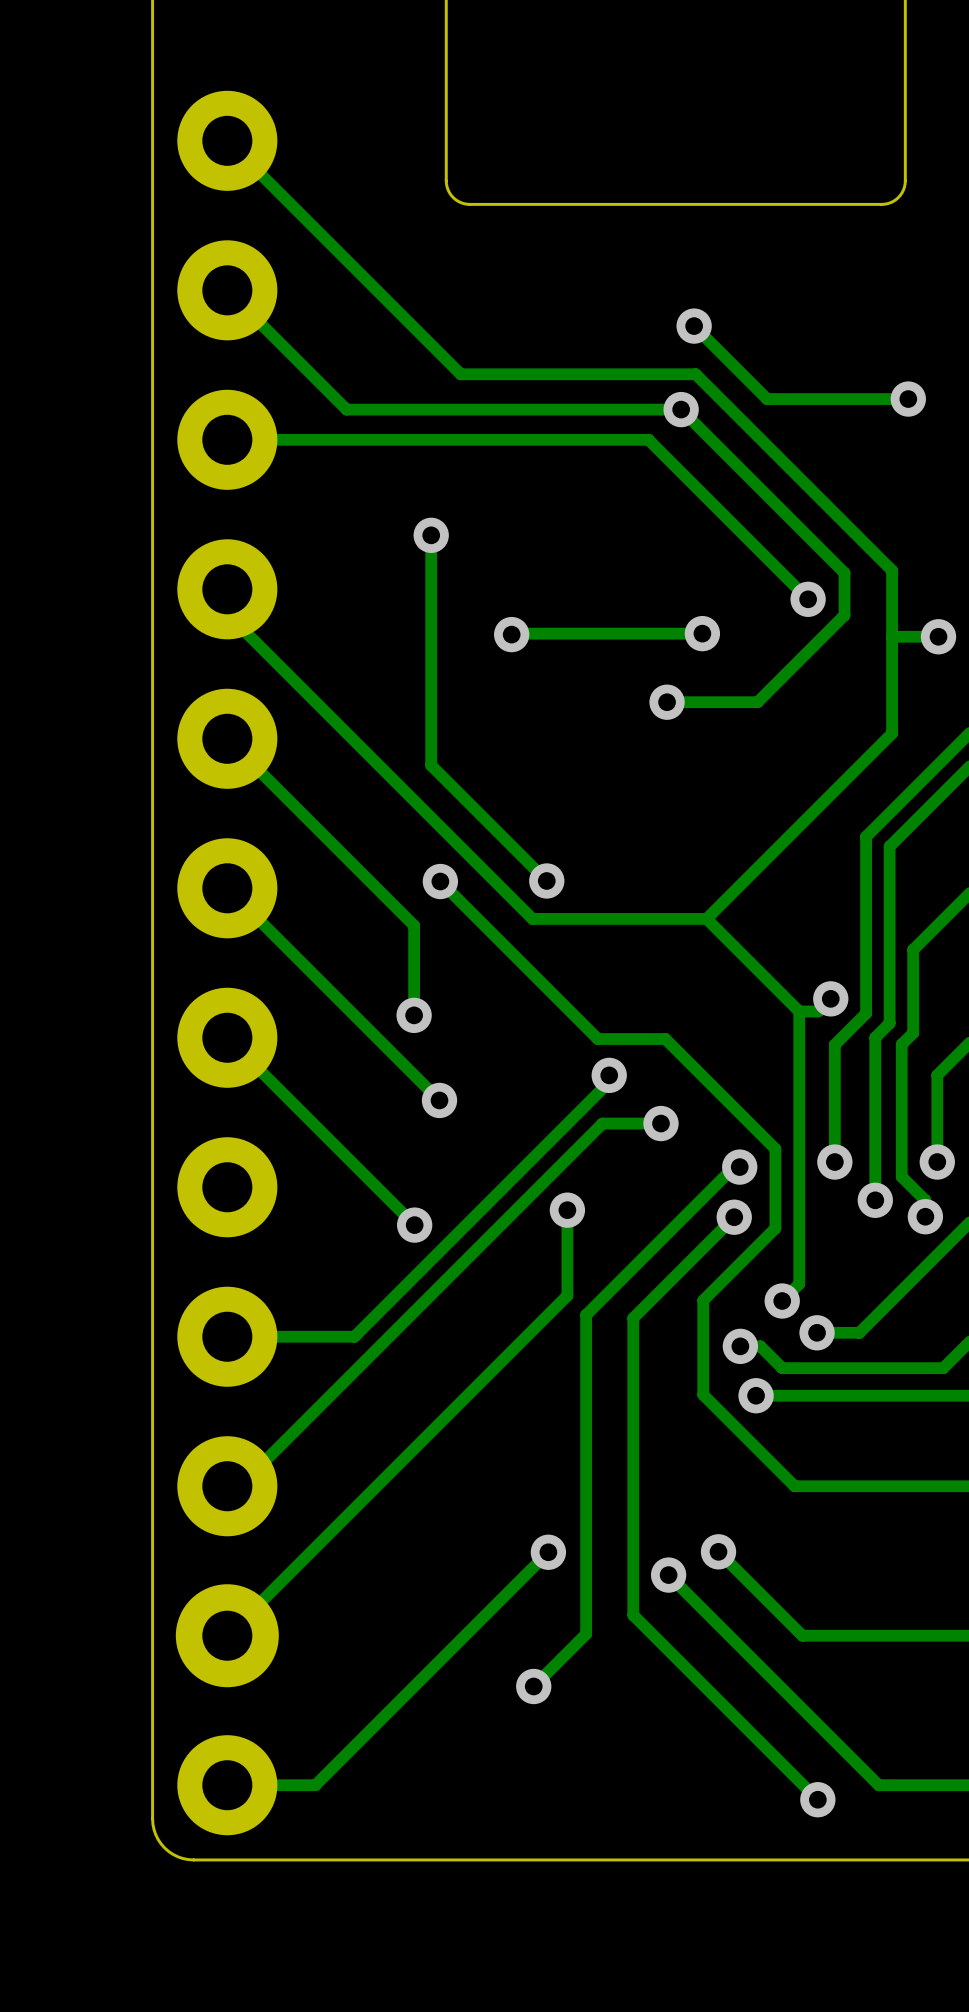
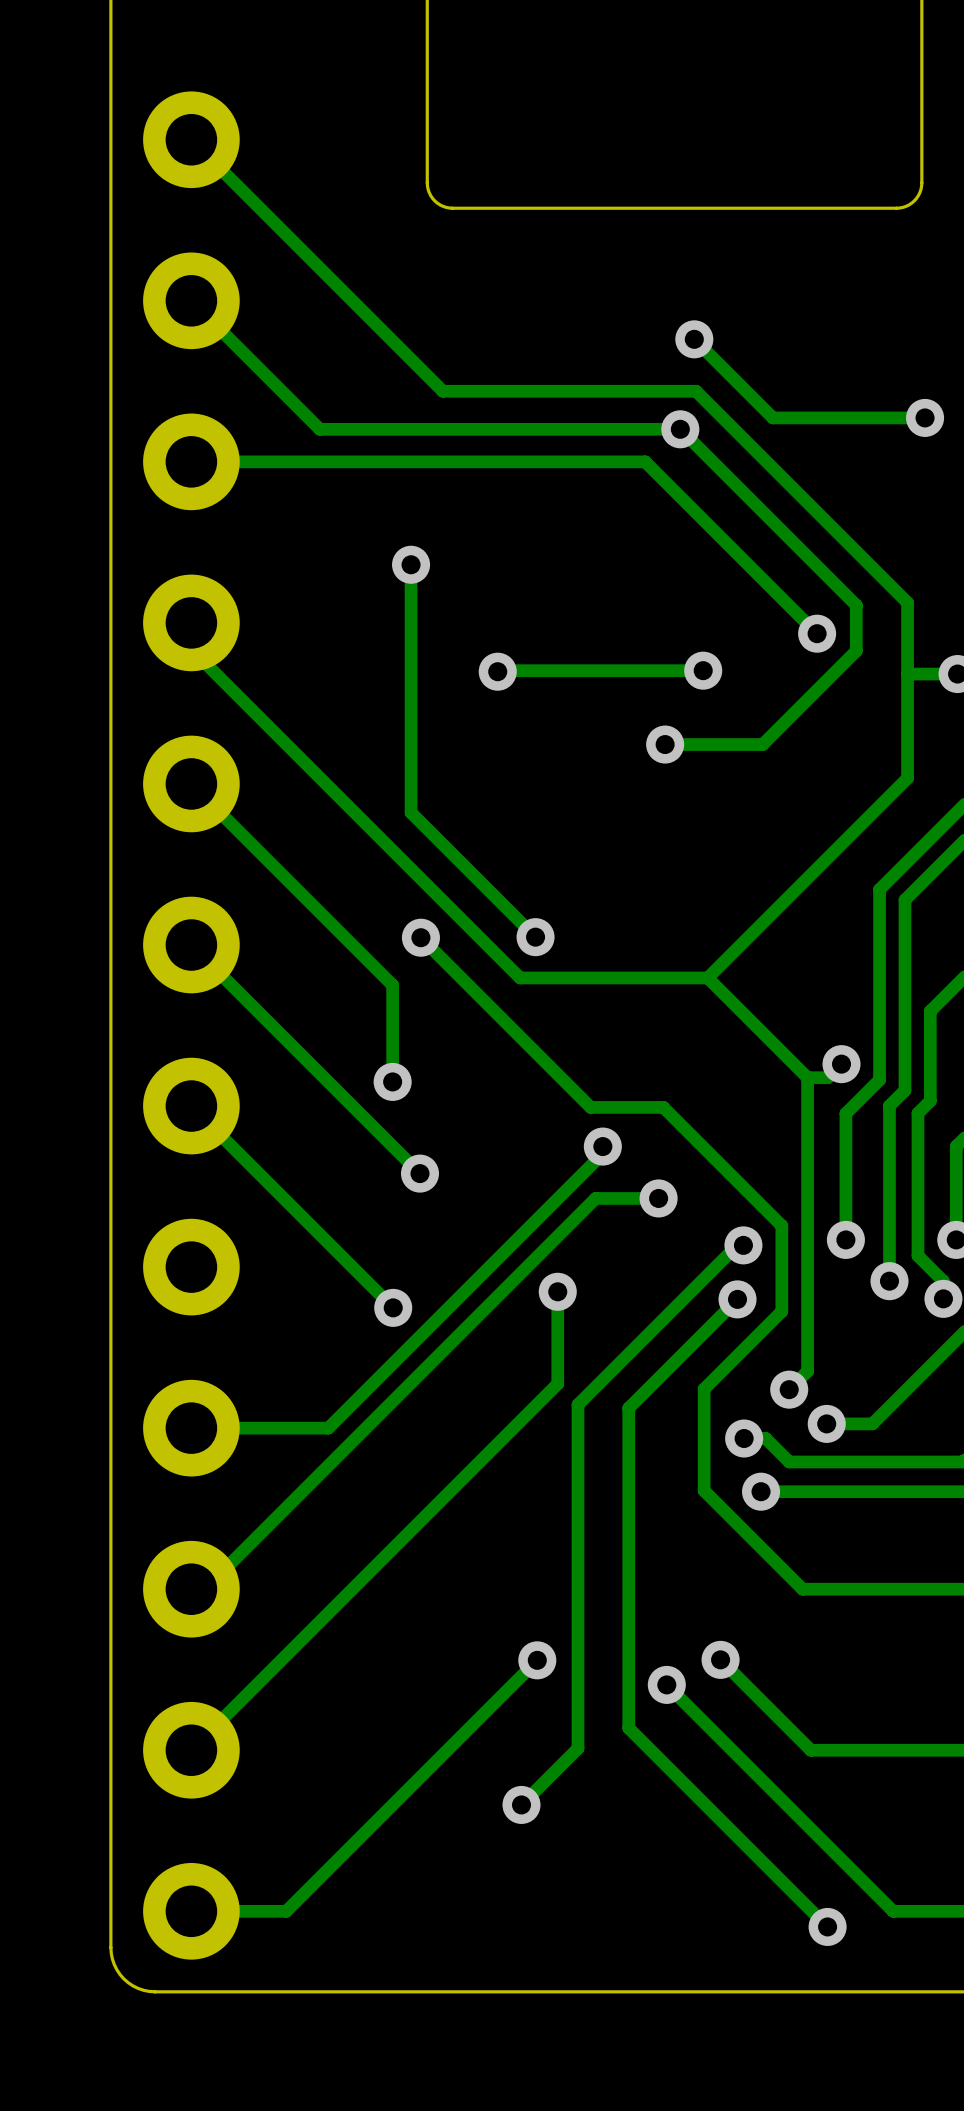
part footprint: [175, 90, 279, 1836] -> [143, 91, 240, 1960]

